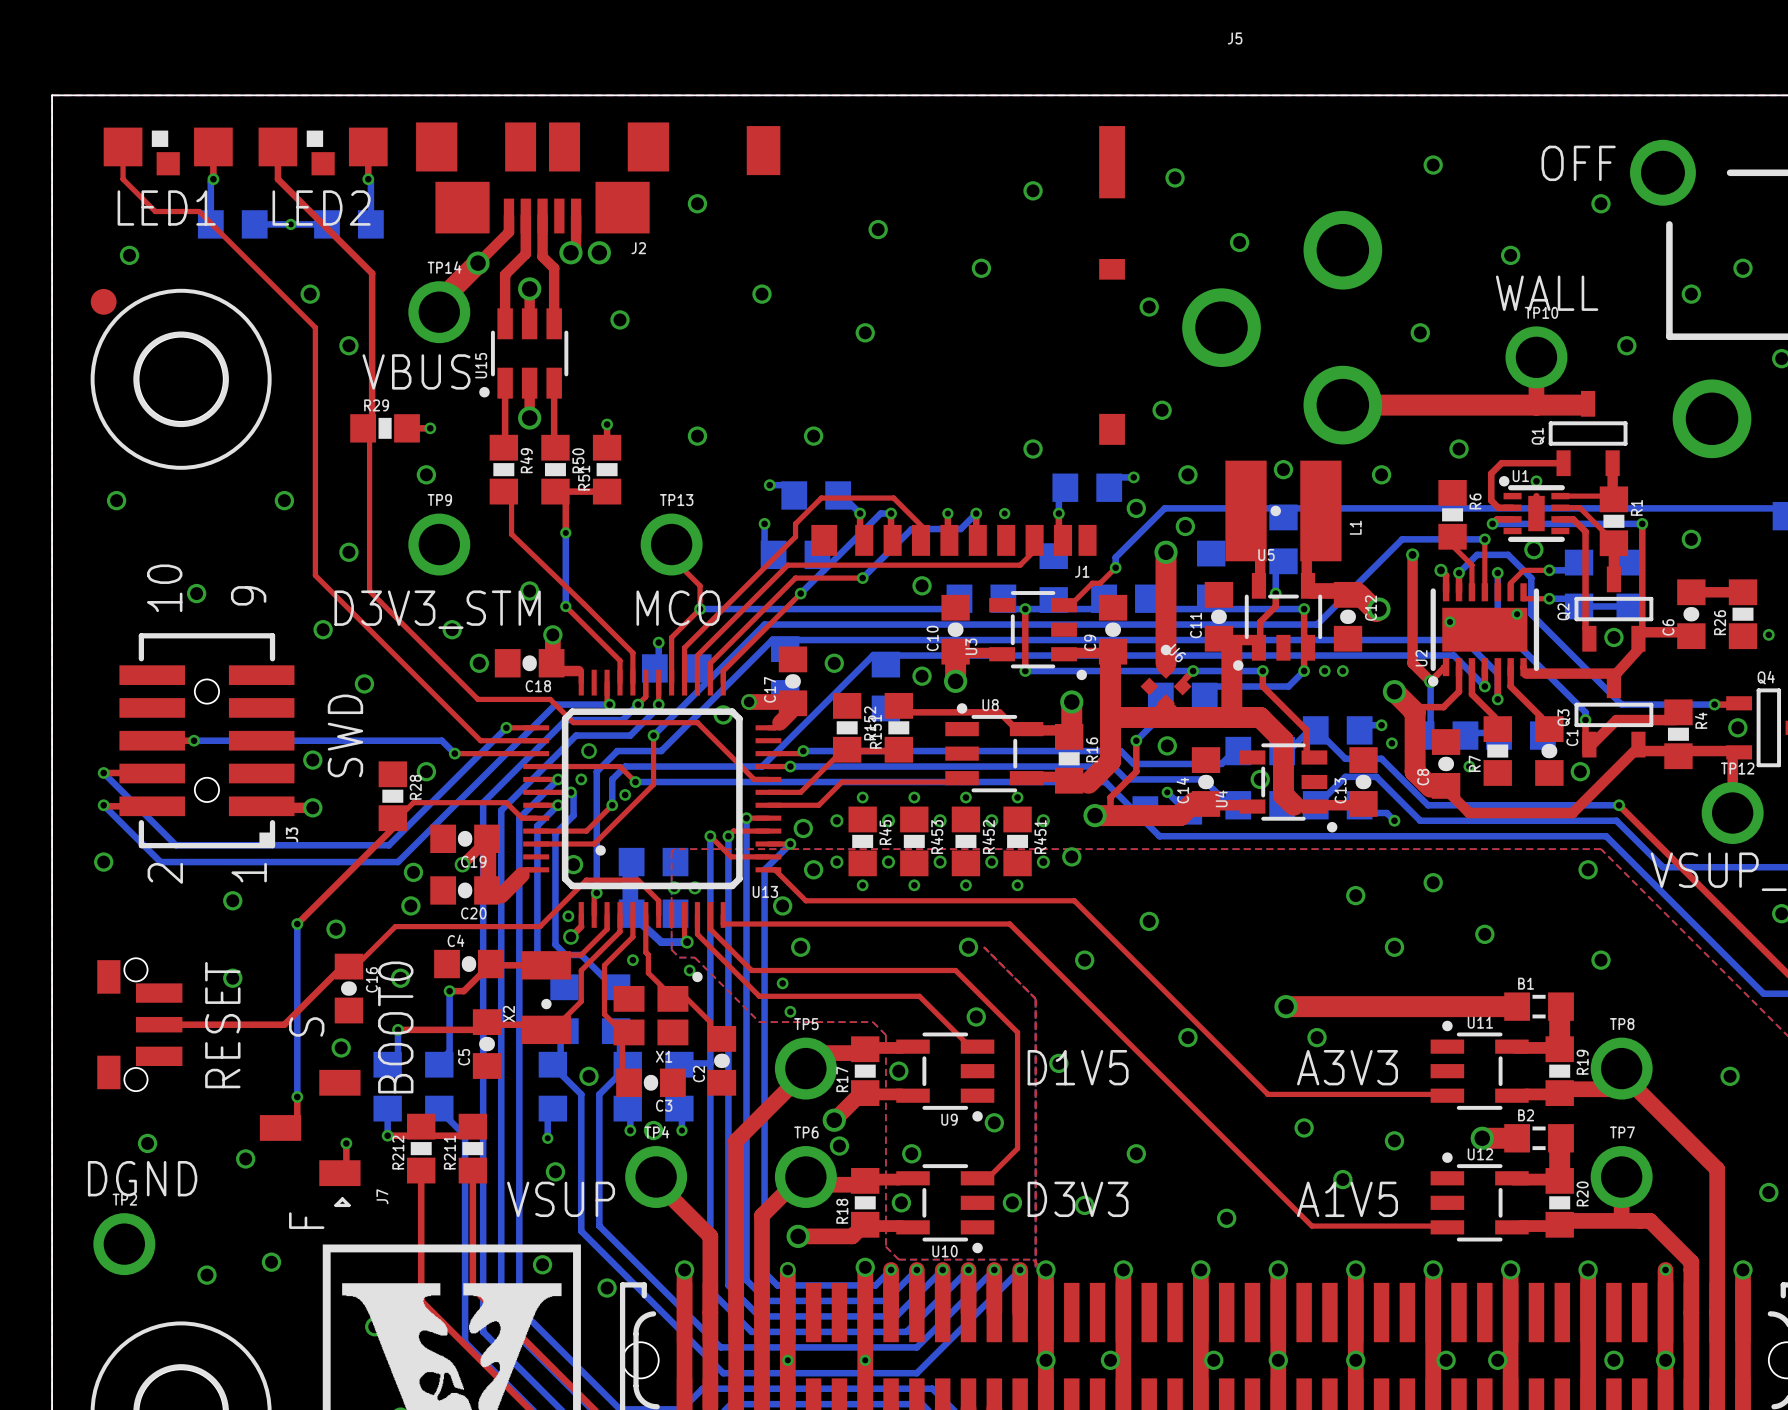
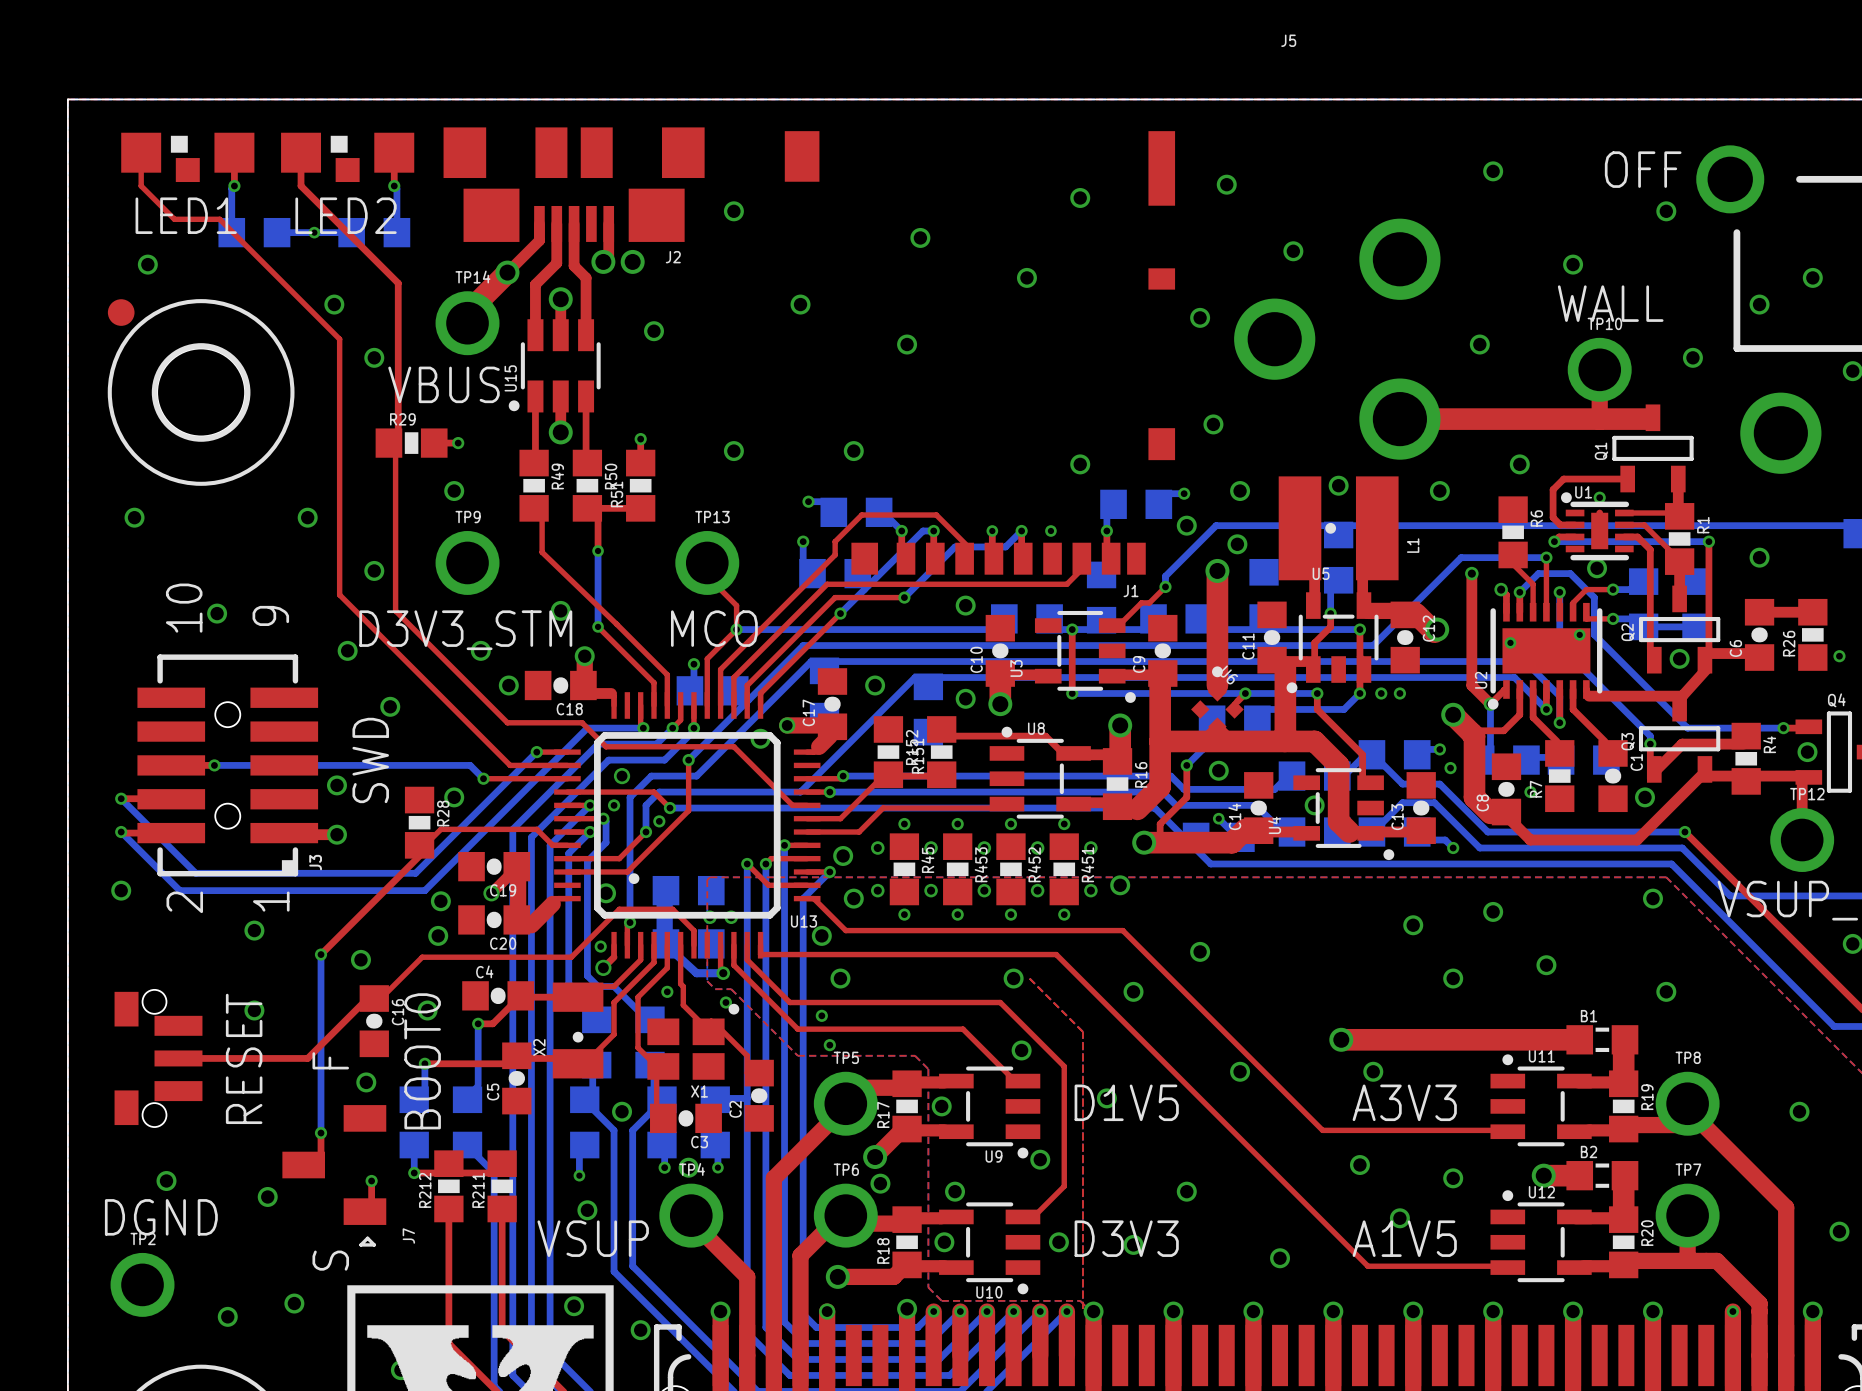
text: S (306, 1026) -> F (330, 1060)
text: F (306, 1220) -> S (330, 1260)

